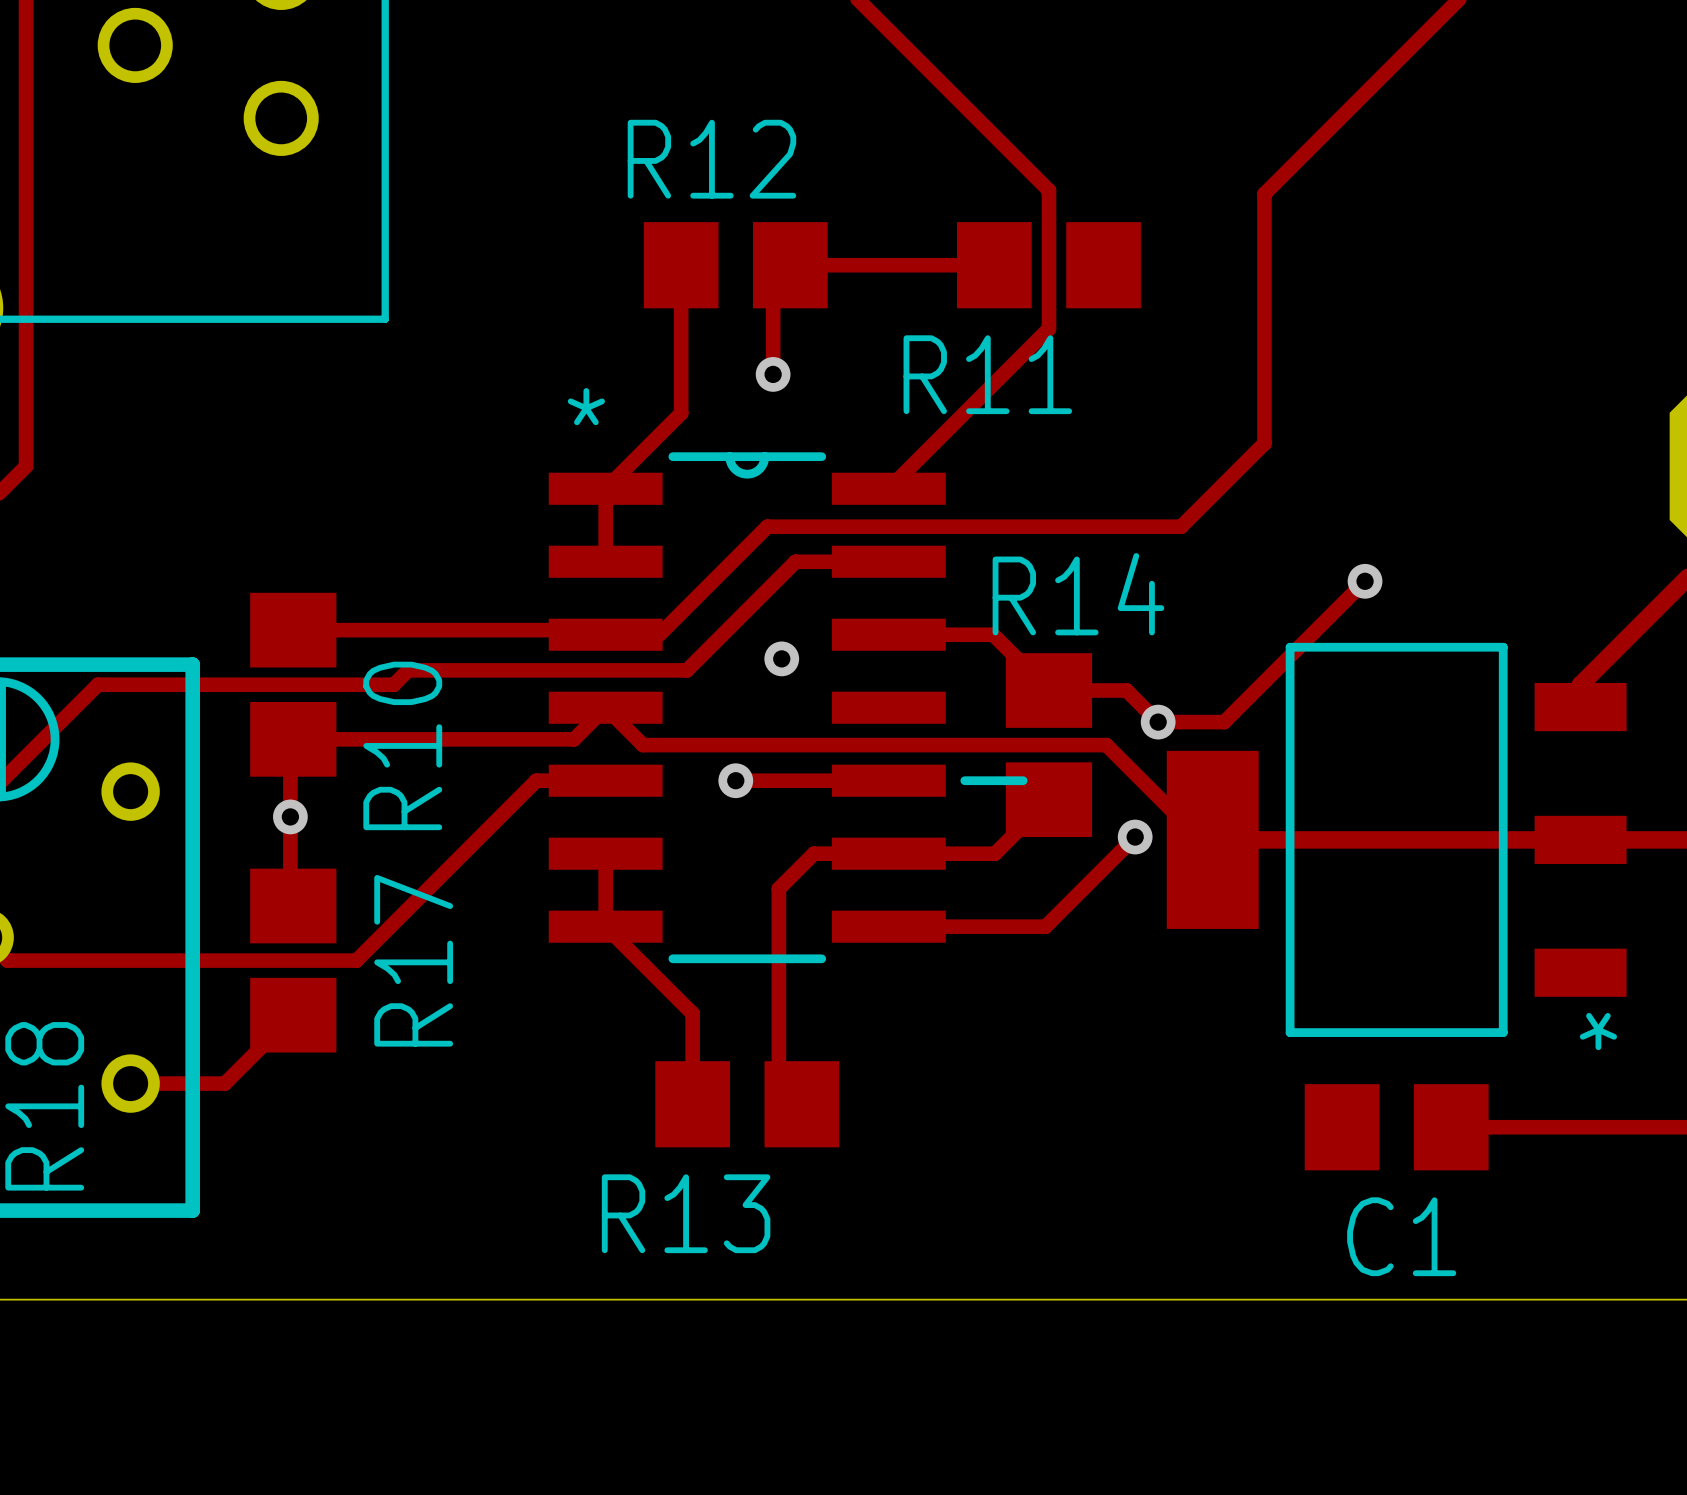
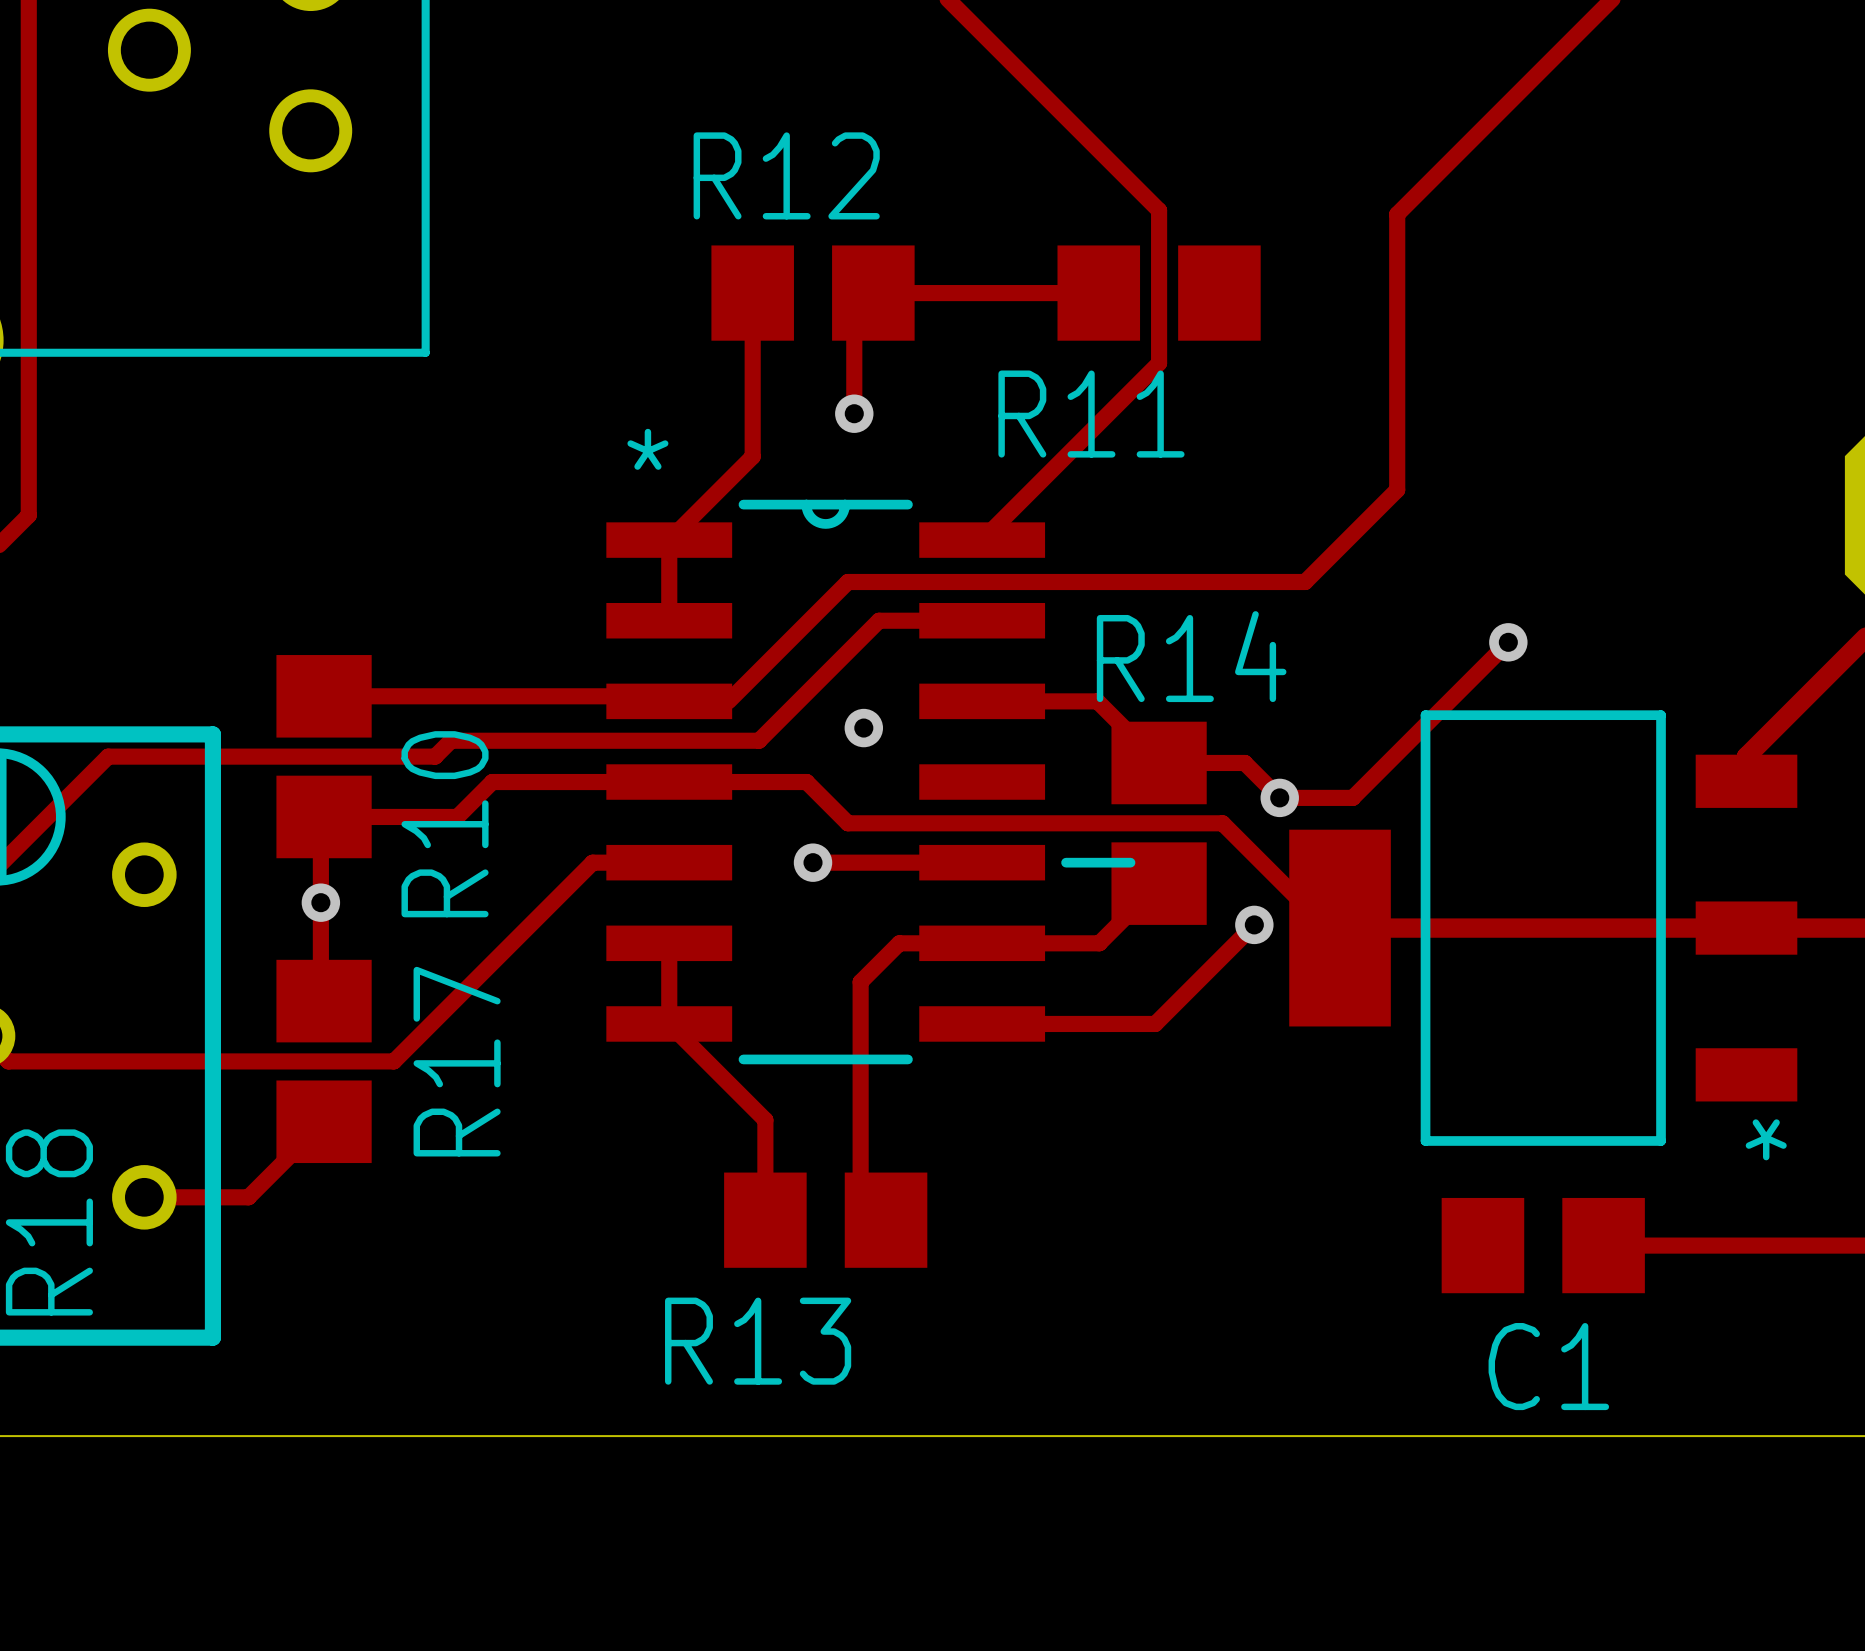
track: (413, 739) (574, 739) (605, 707) (643, 745) (767, 745) -> (457, 816) (492, 782) (806, 782) (847, 823)

